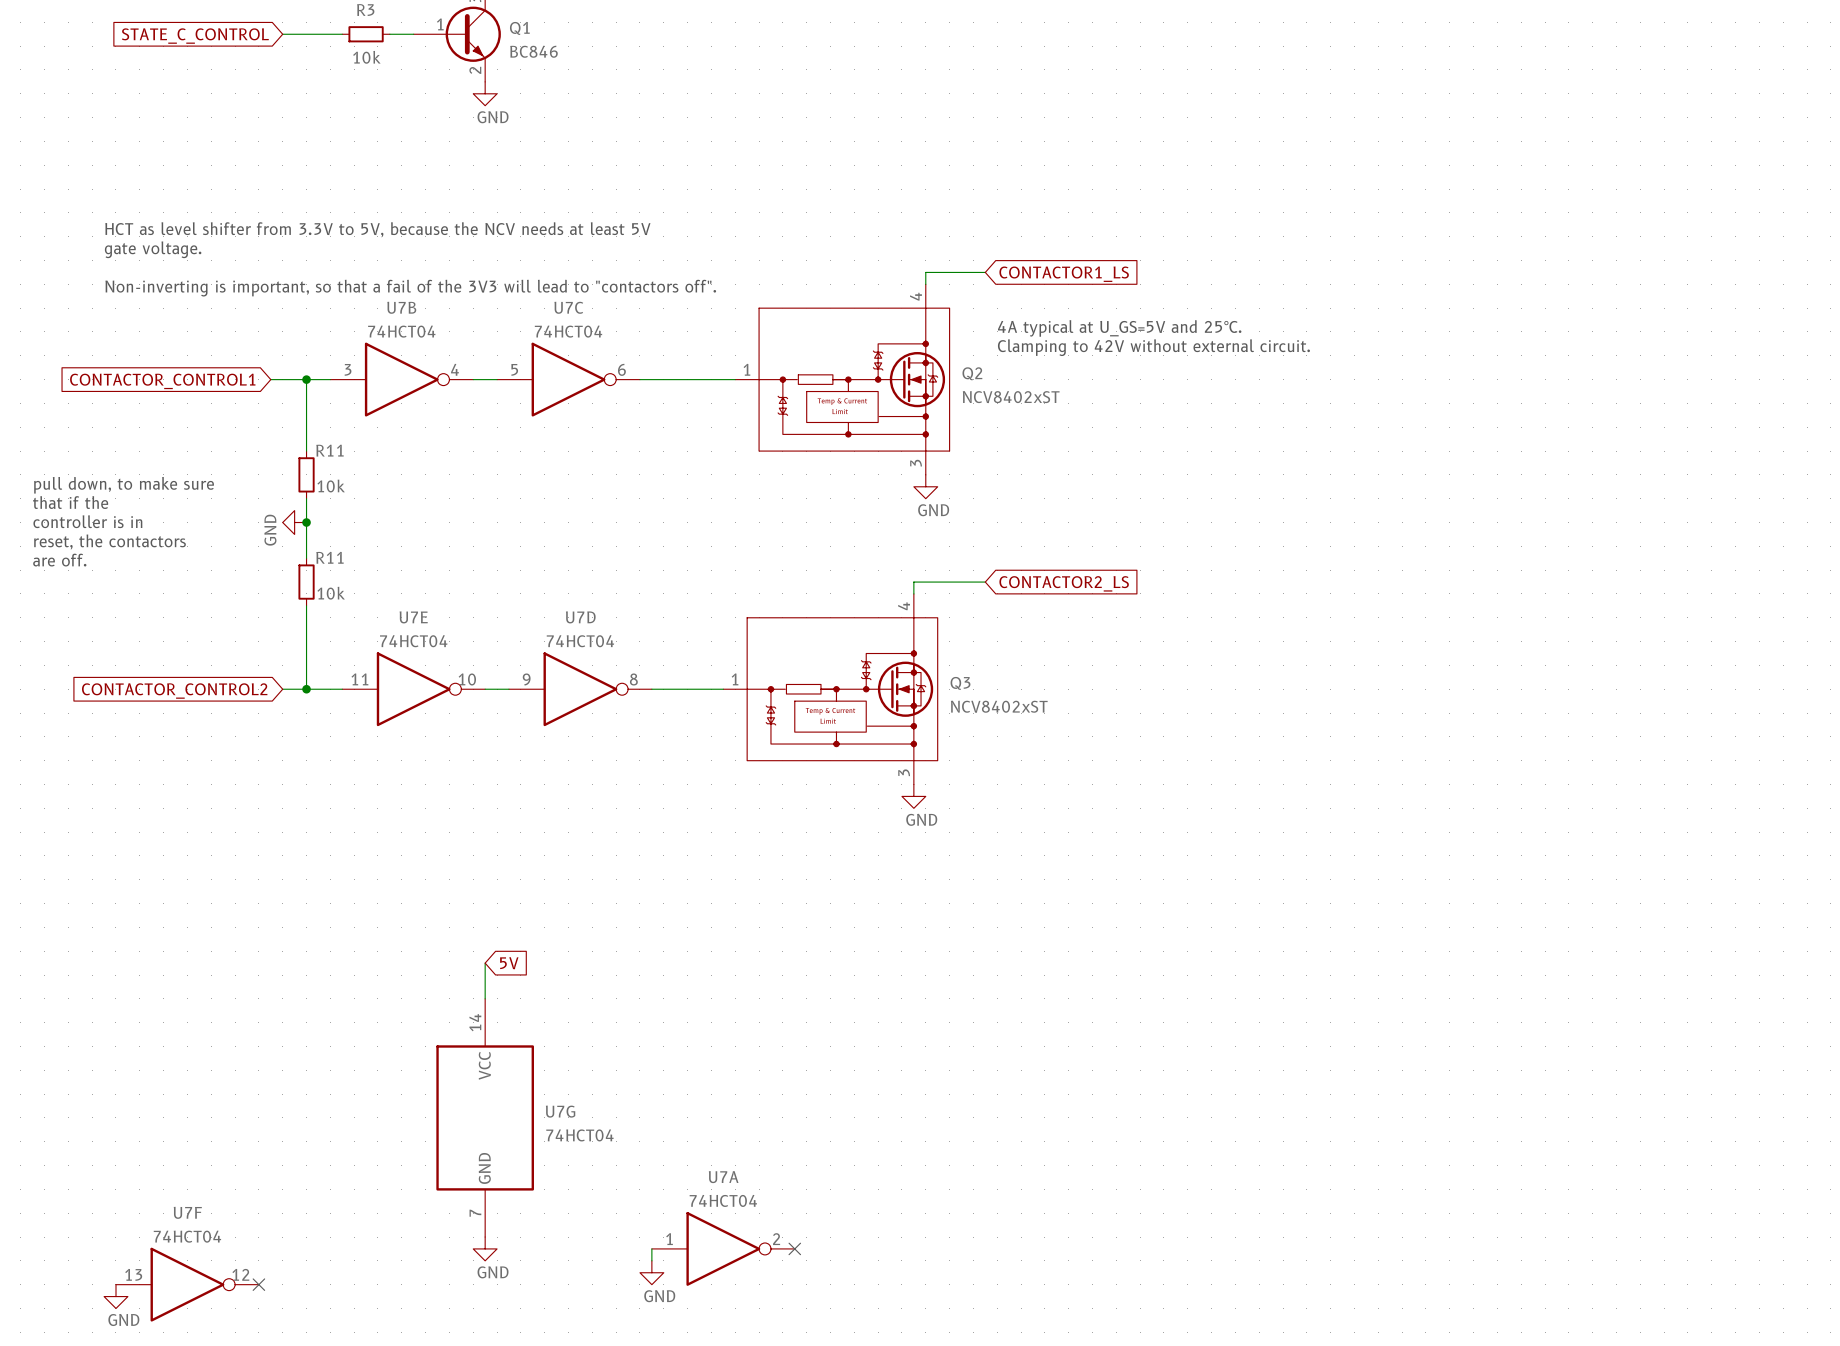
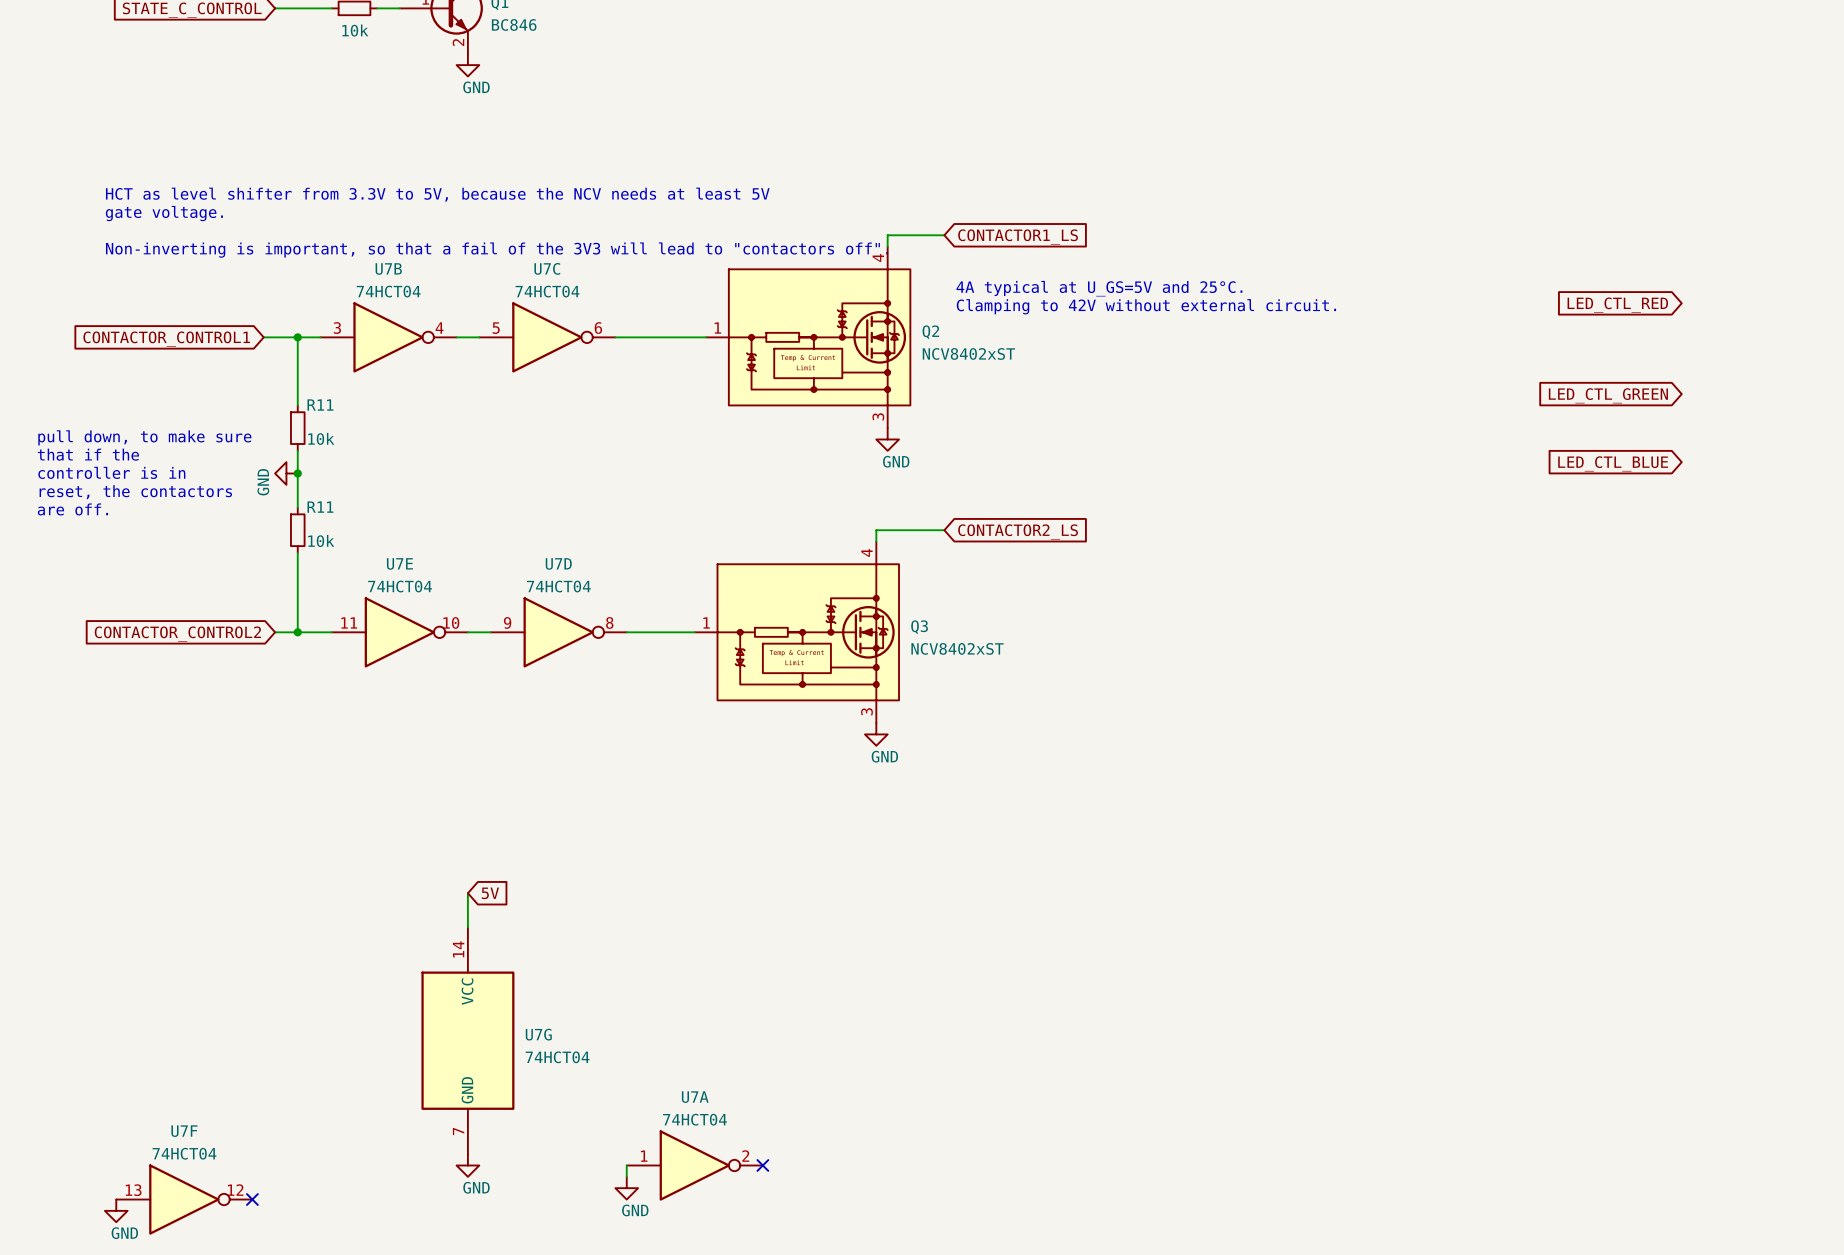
global label: none -> LED_CTL_RED (1617, 305)
global label: none -> LED_CTL_GREEN (1608, 395)
global label: none -> LED_CTL_BLUE (1613, 463)

